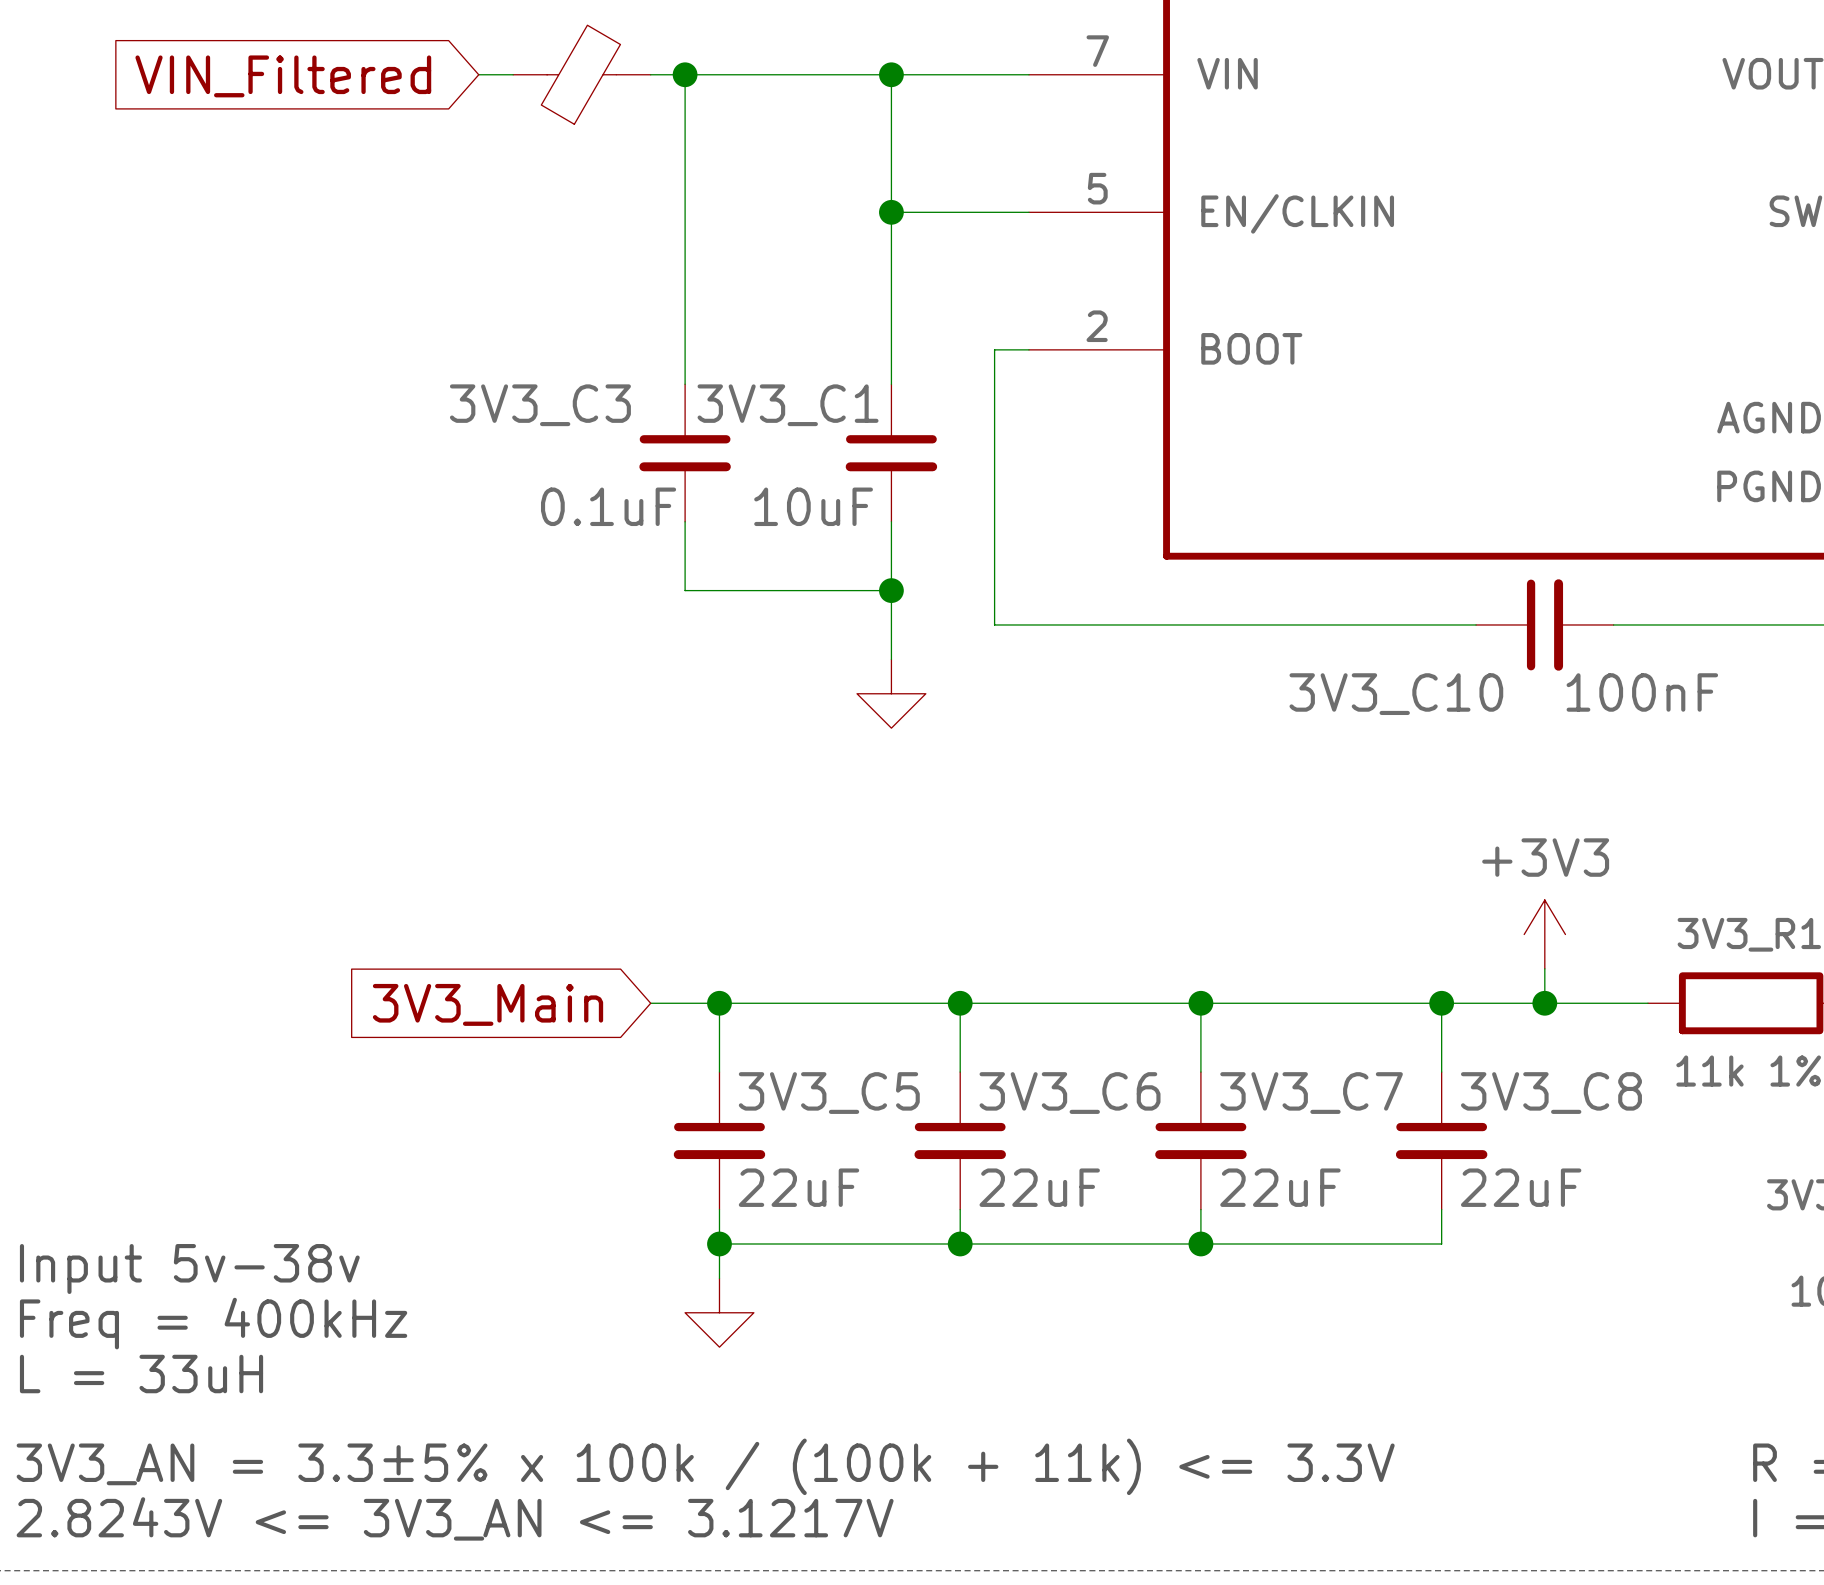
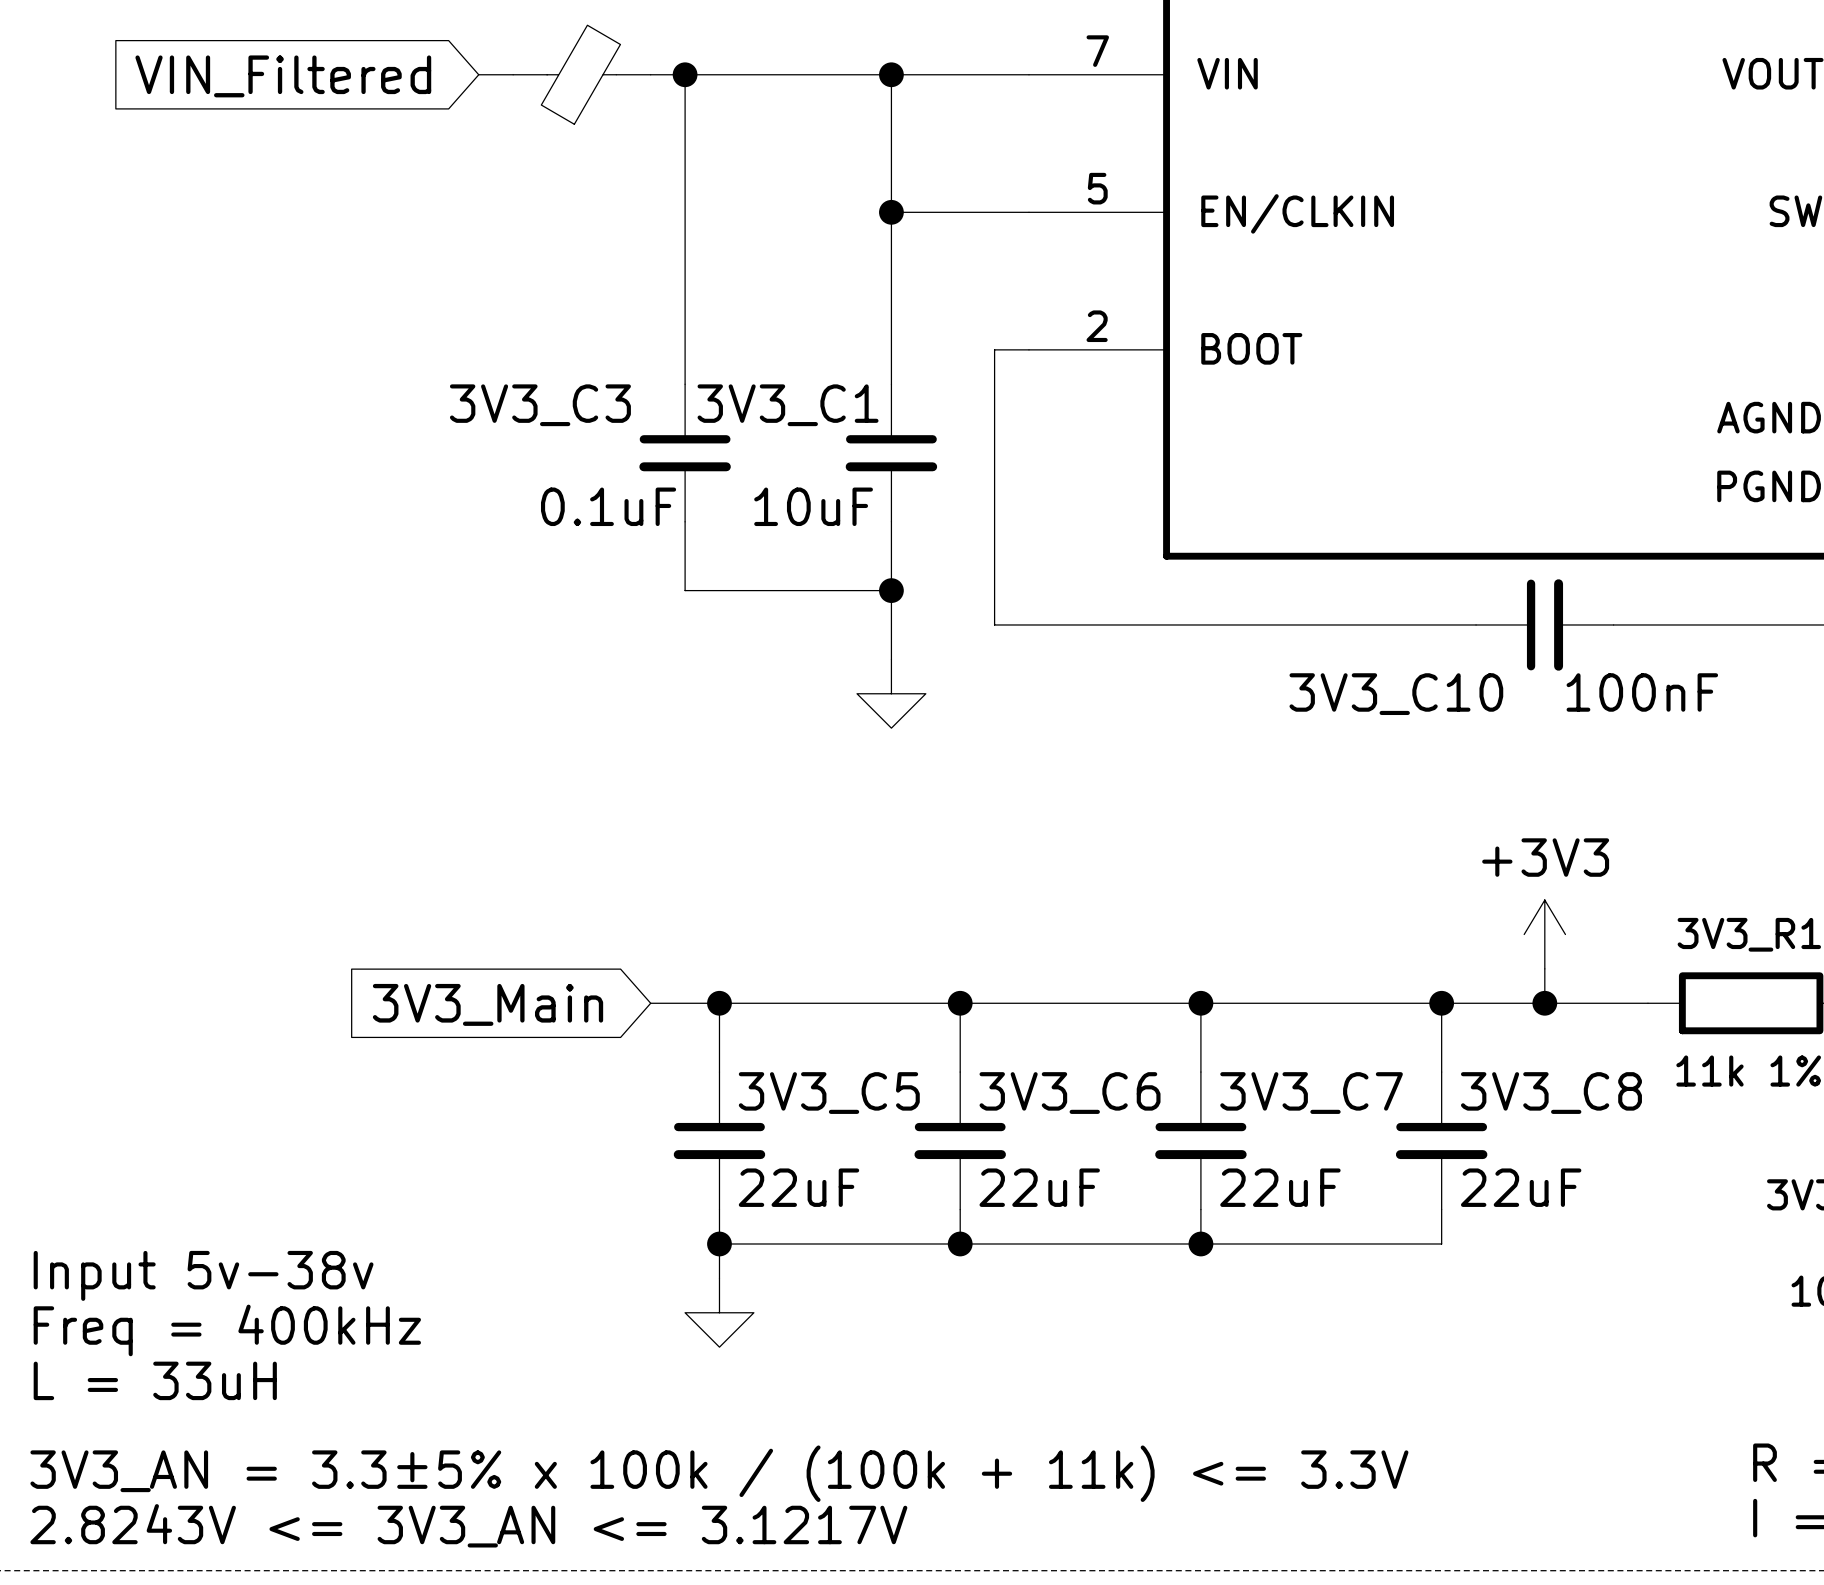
text position: Input 5v-38v (189, 1269) -> Input 5v-38v (203, 1275)
text position: Freq = 400kHz (213, 1323) -> Freq = 400kHz (227, 1330)
text position: L = 33uH (141, 1374) -> L = 33uH (155, 1380)
text position: 3V3_AN = 3.3±5% x 100k / (100k + 11k) <= 3.3V (705, 1466) -> 3V3_AN = 3.3±5% x 100k / (100k + 11k) <= 3.3V (719, 1473)
text position: 2.8243V <= 3V3_AN <= 3.1217V (455, 1518) -> 2.8243V <= 3V3_AN <= 3.1217V (468, 1525)

